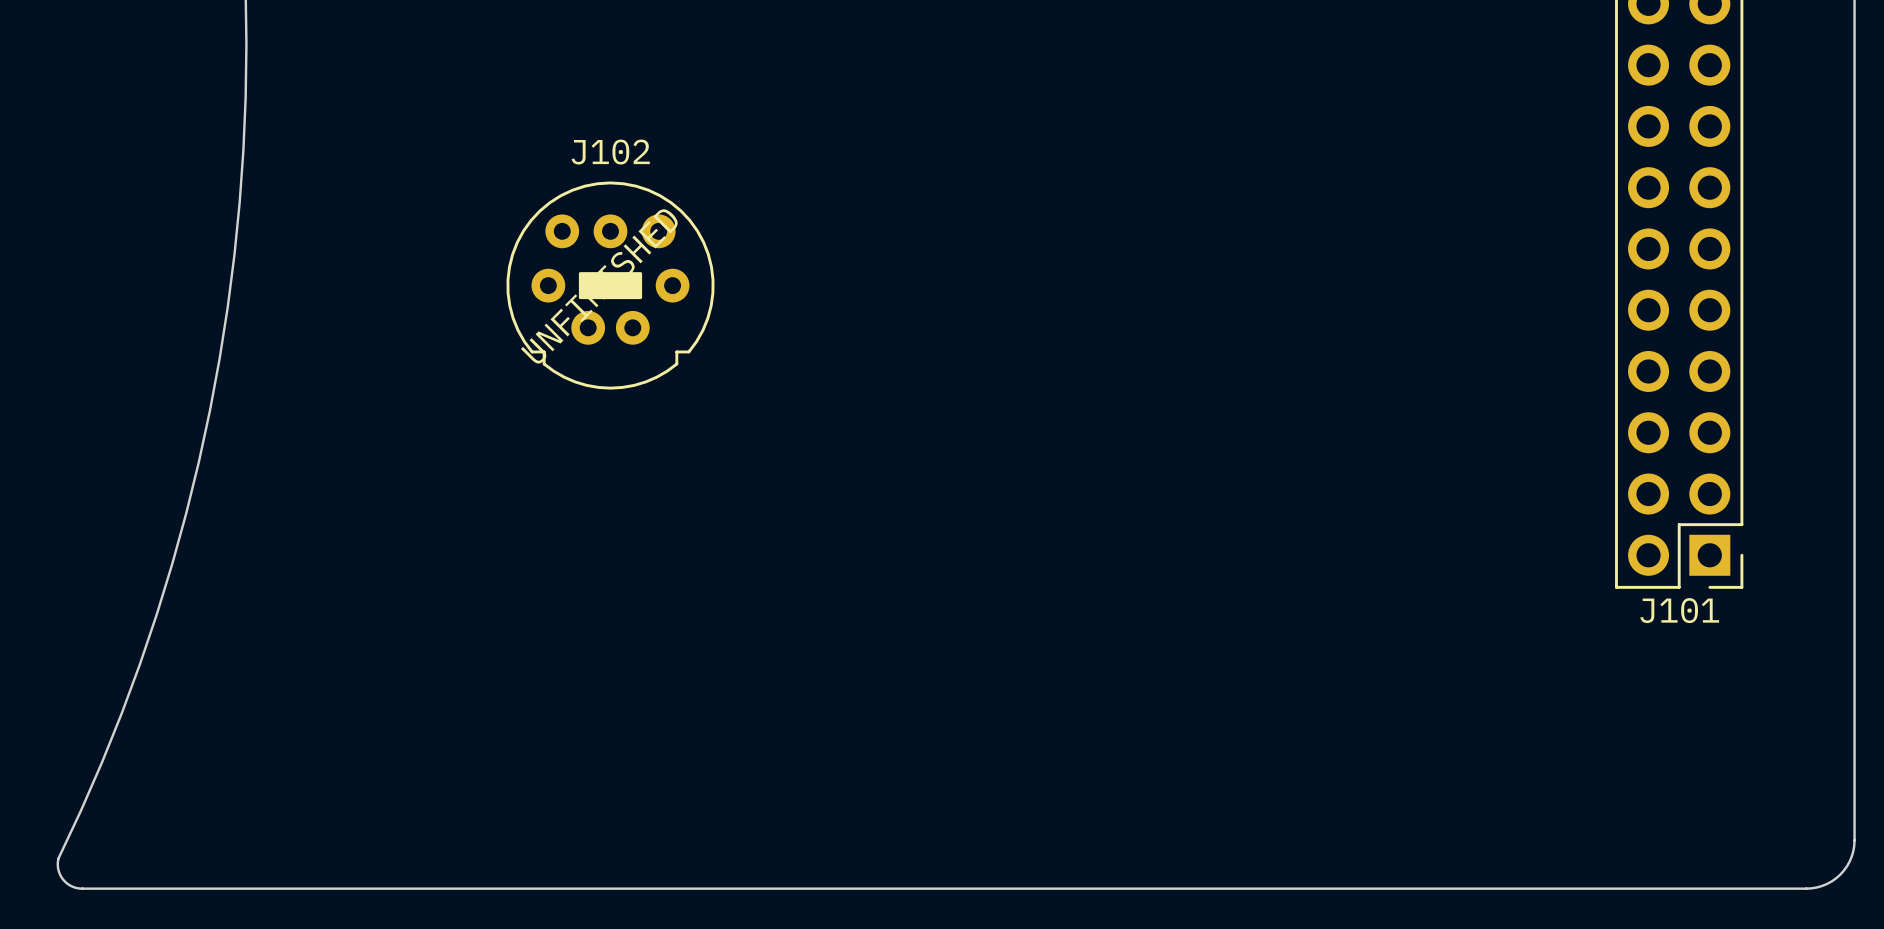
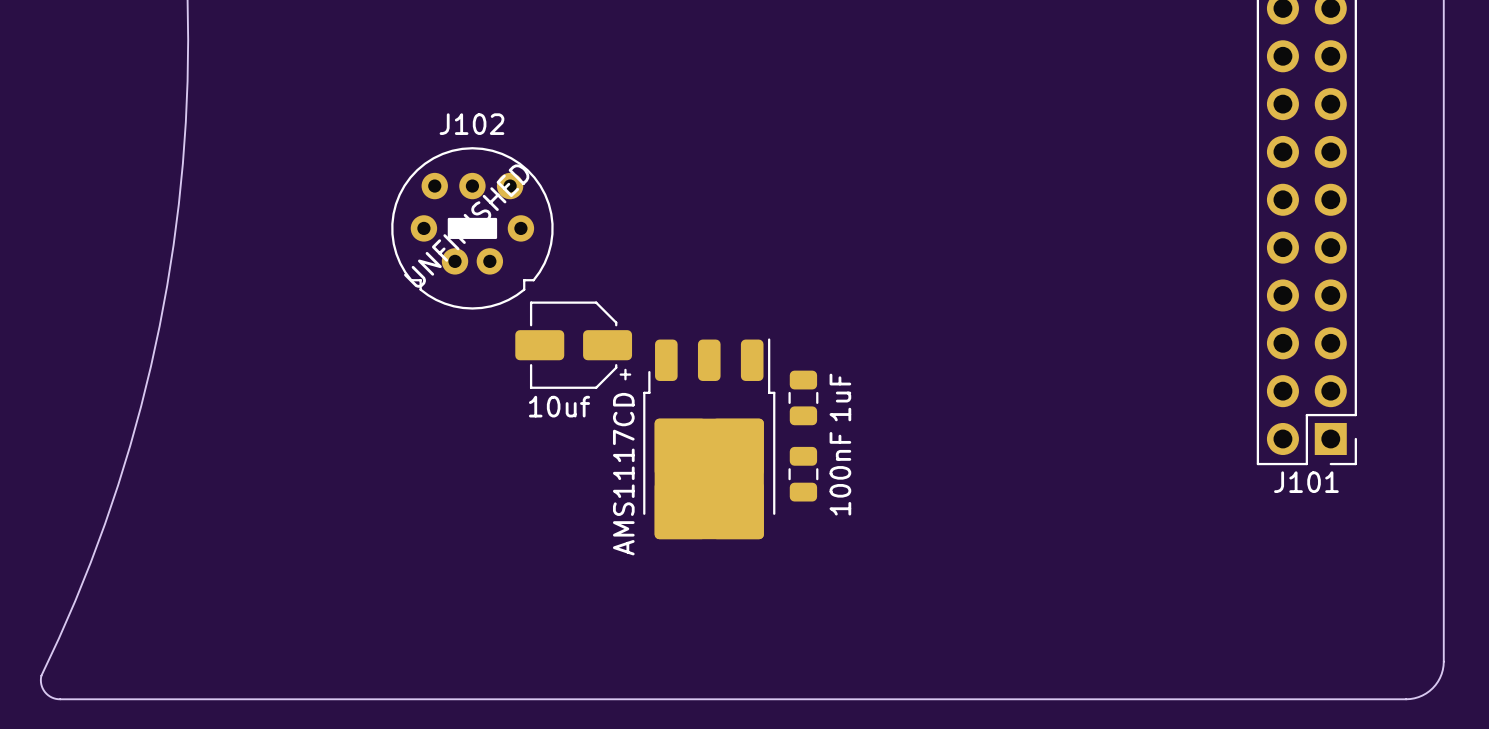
part: none -> 10uf (573, 345)
part: none -> 1uF (803, 397)
part: none -> AMS1117CD (709, 438)
part: none -> 100nF (803, 474)

